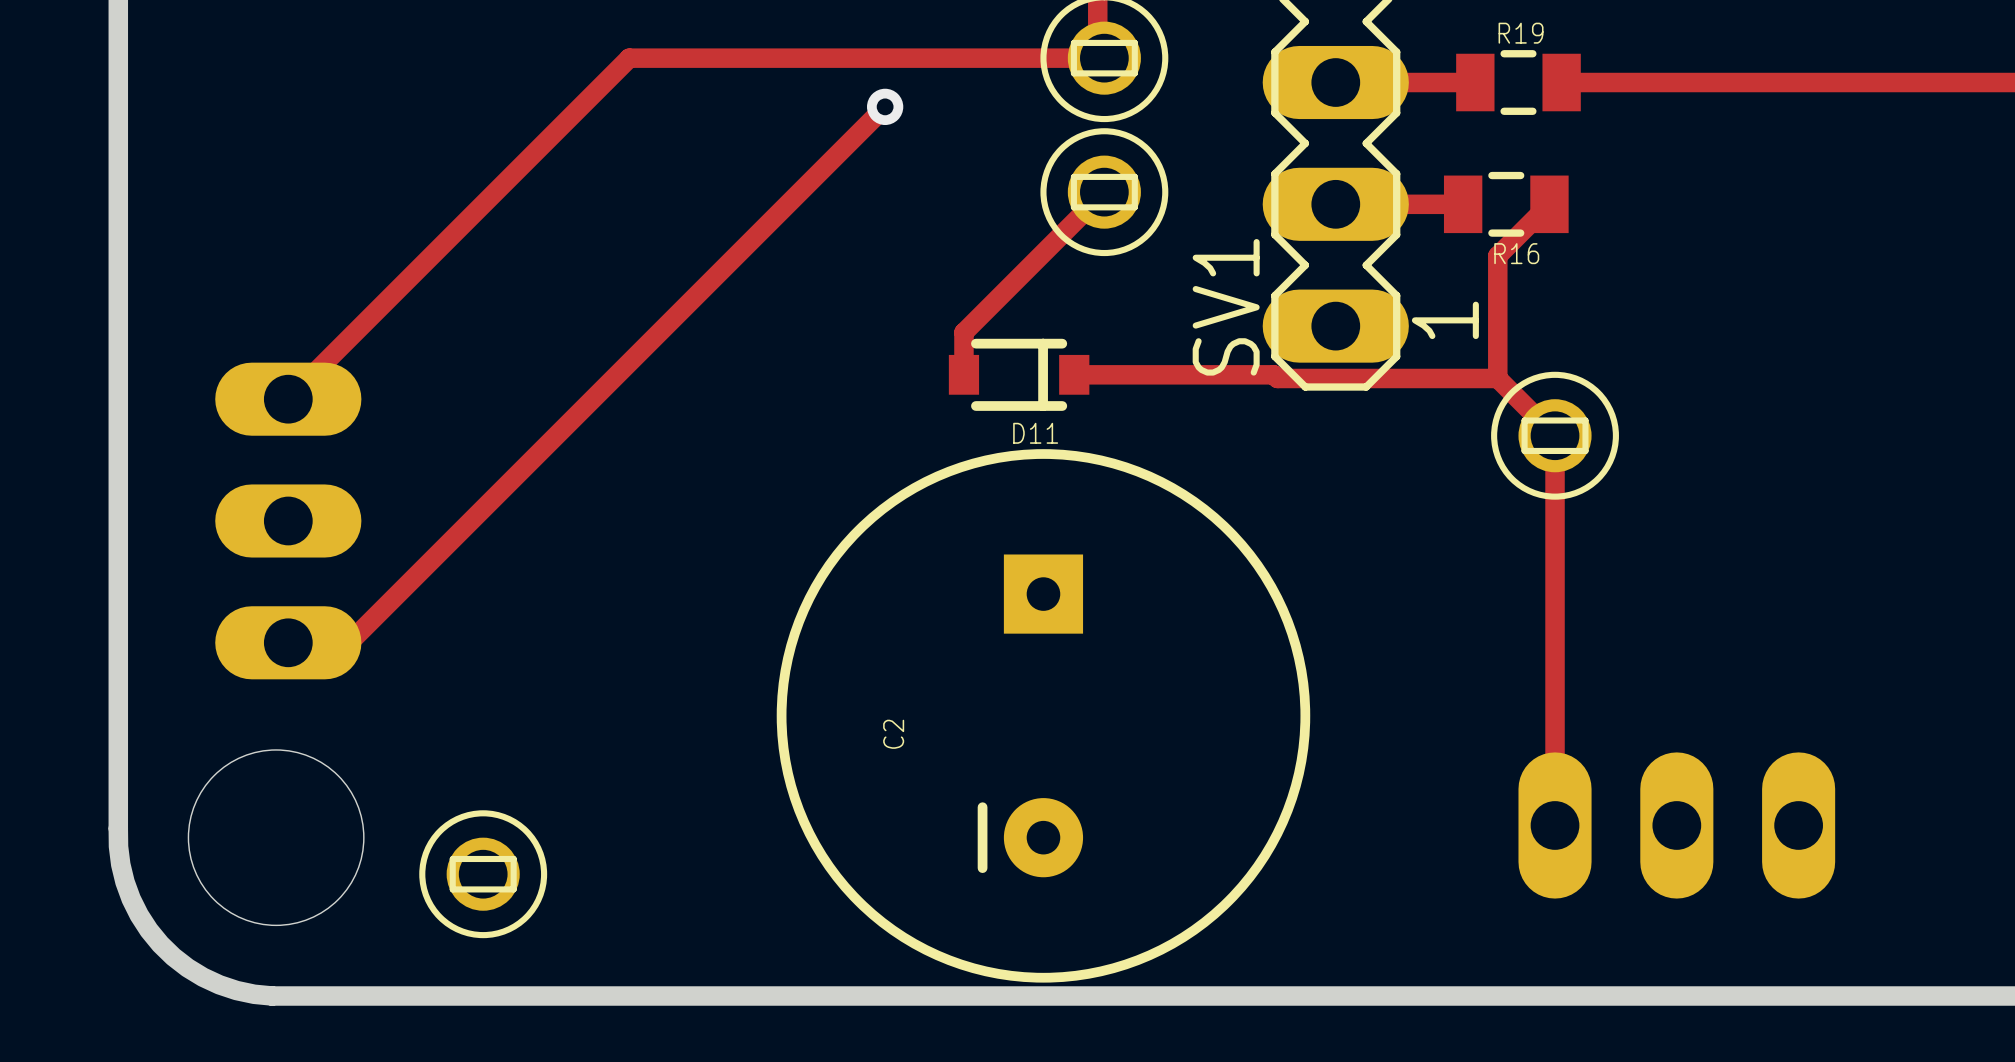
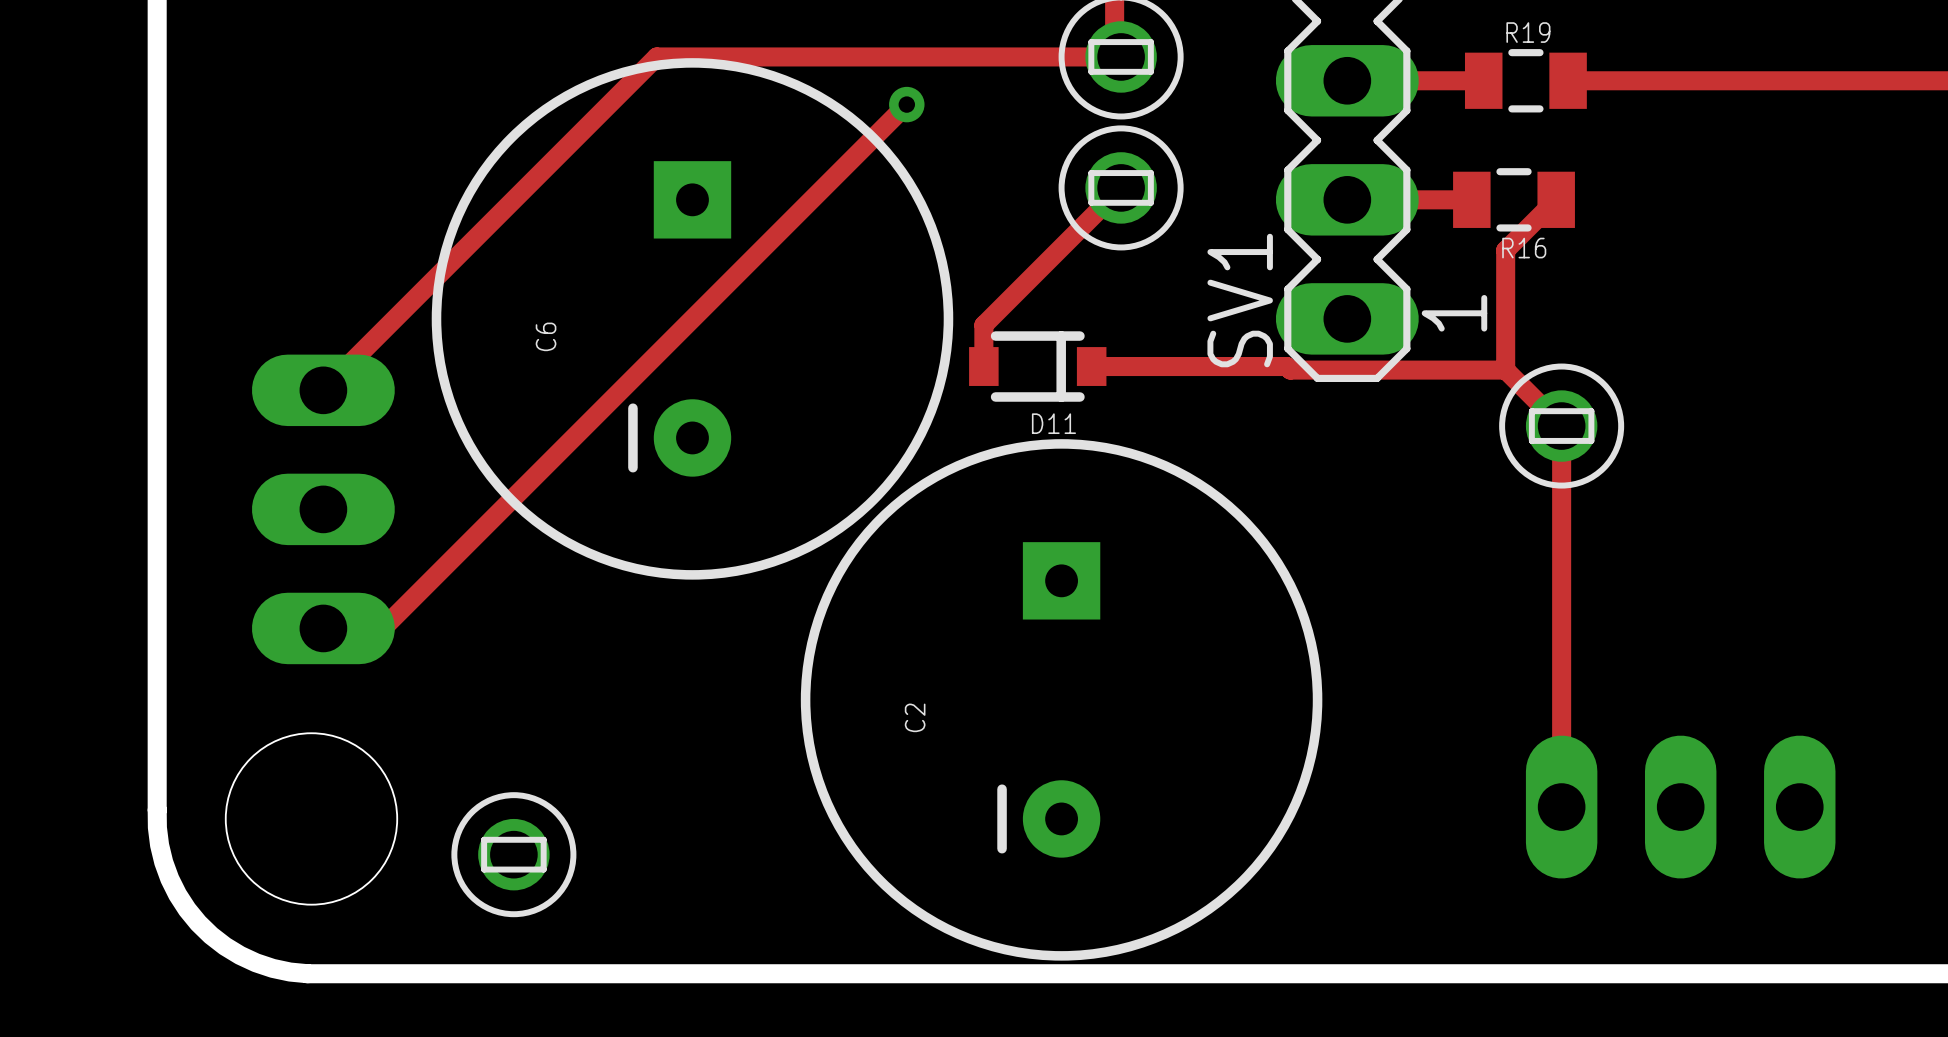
C6: none -> (692, 318)

